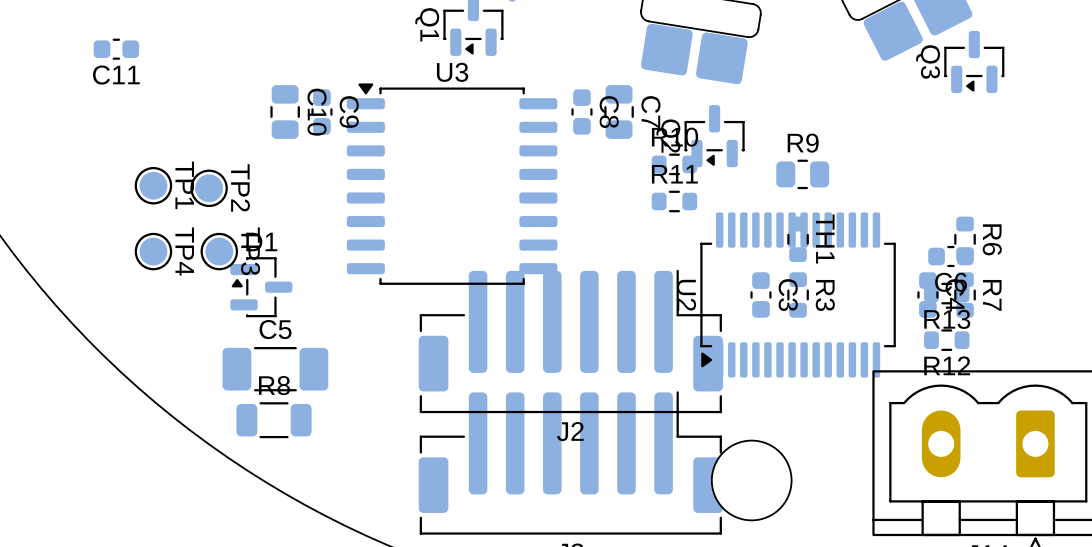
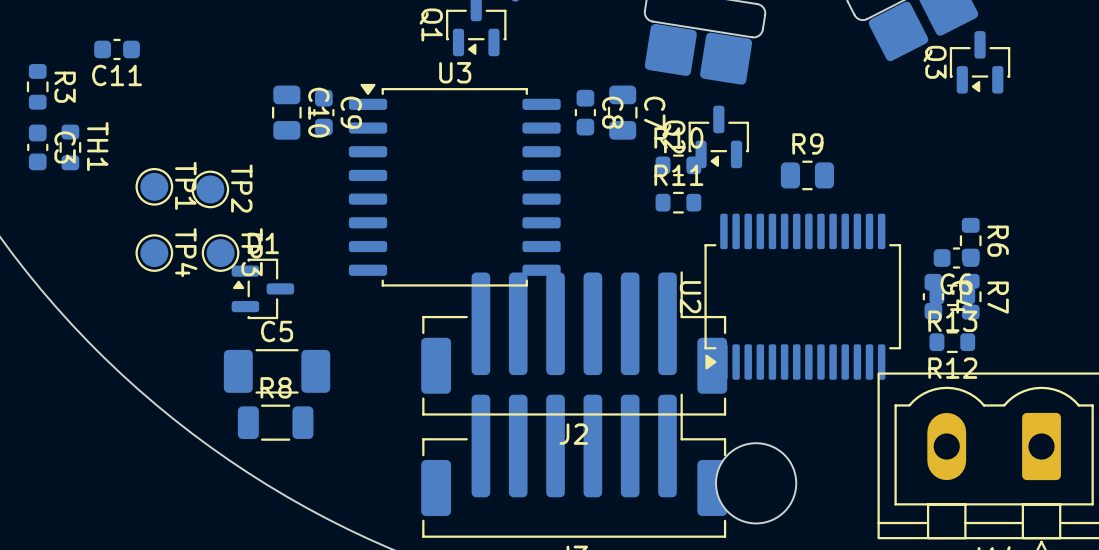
TH1 position: (798, 239) -> (70, 147)
C3 position: (760, 294) -> (37, 147)
R3 position: (798, 294) -> (37, 86)

